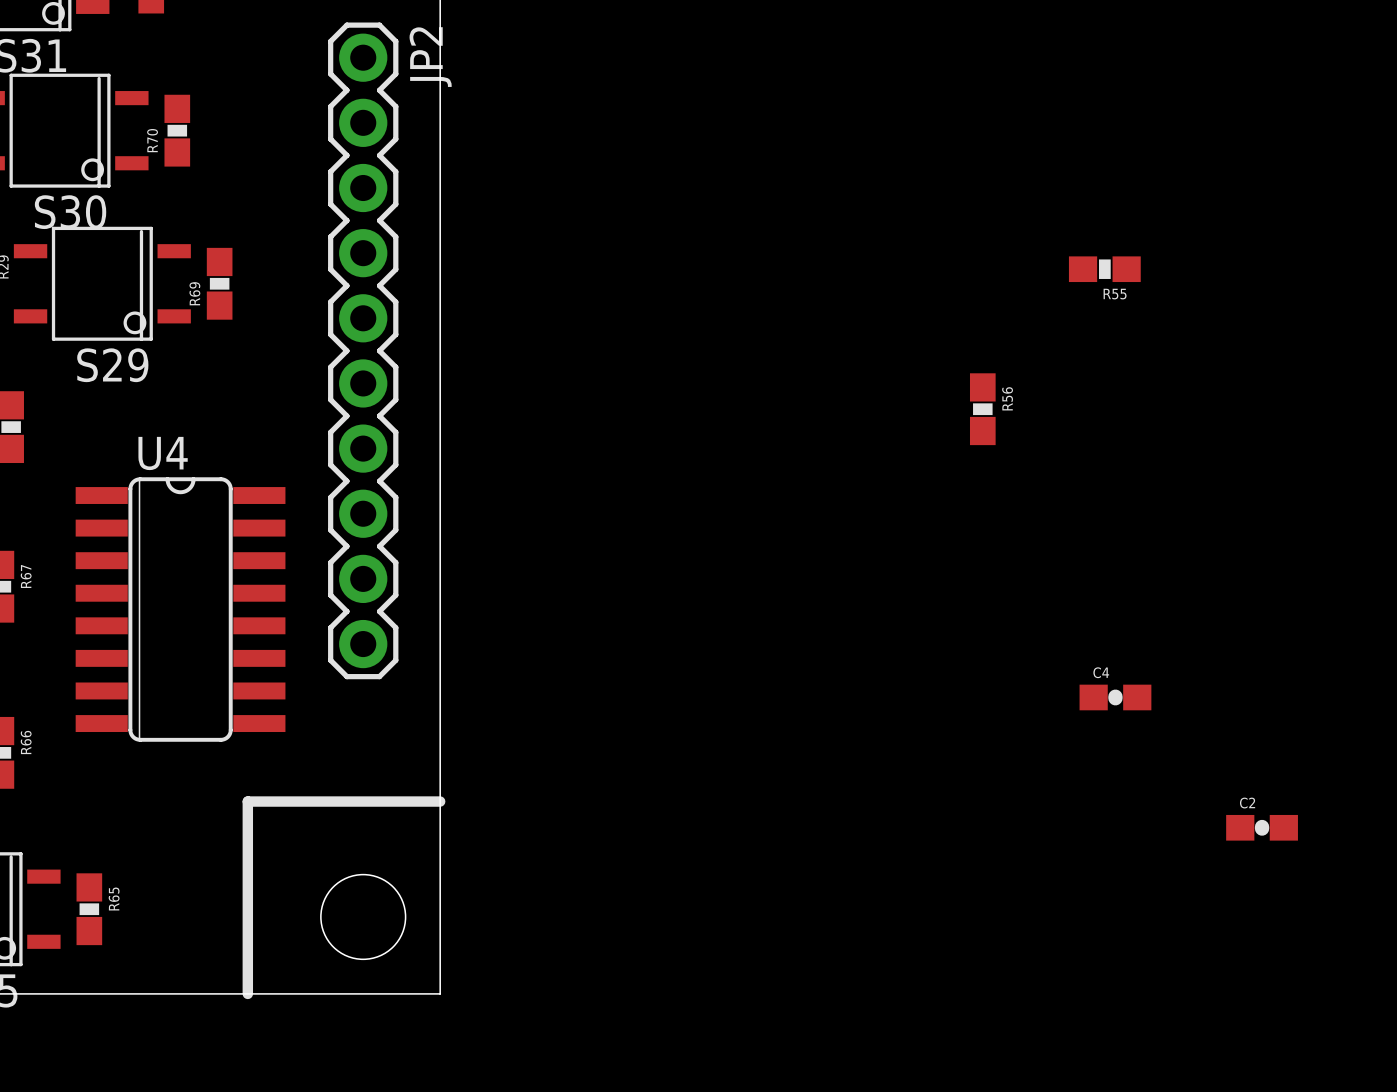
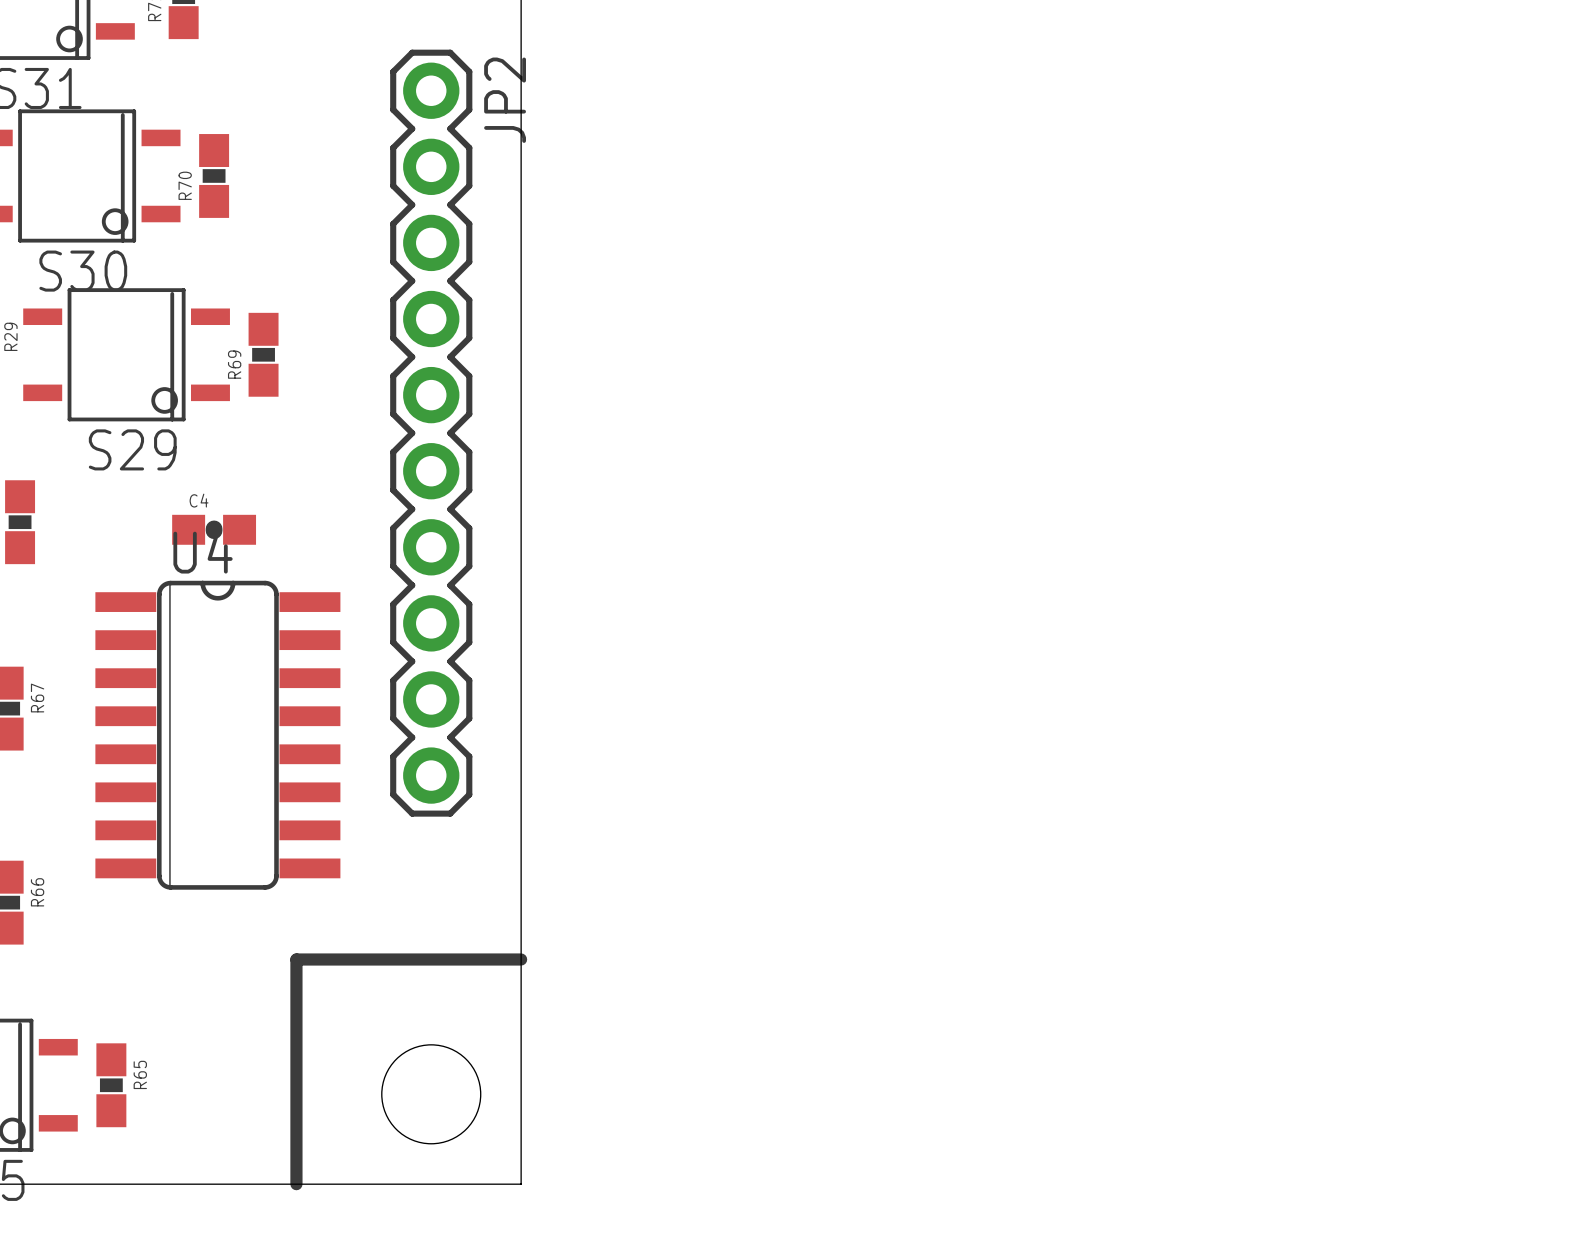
R55: (1104, 269) -> none
R56: (982, 409) -> none
C4 position: (1115, 697) -> (214, 529)
C2: (1262, 827) -> none

